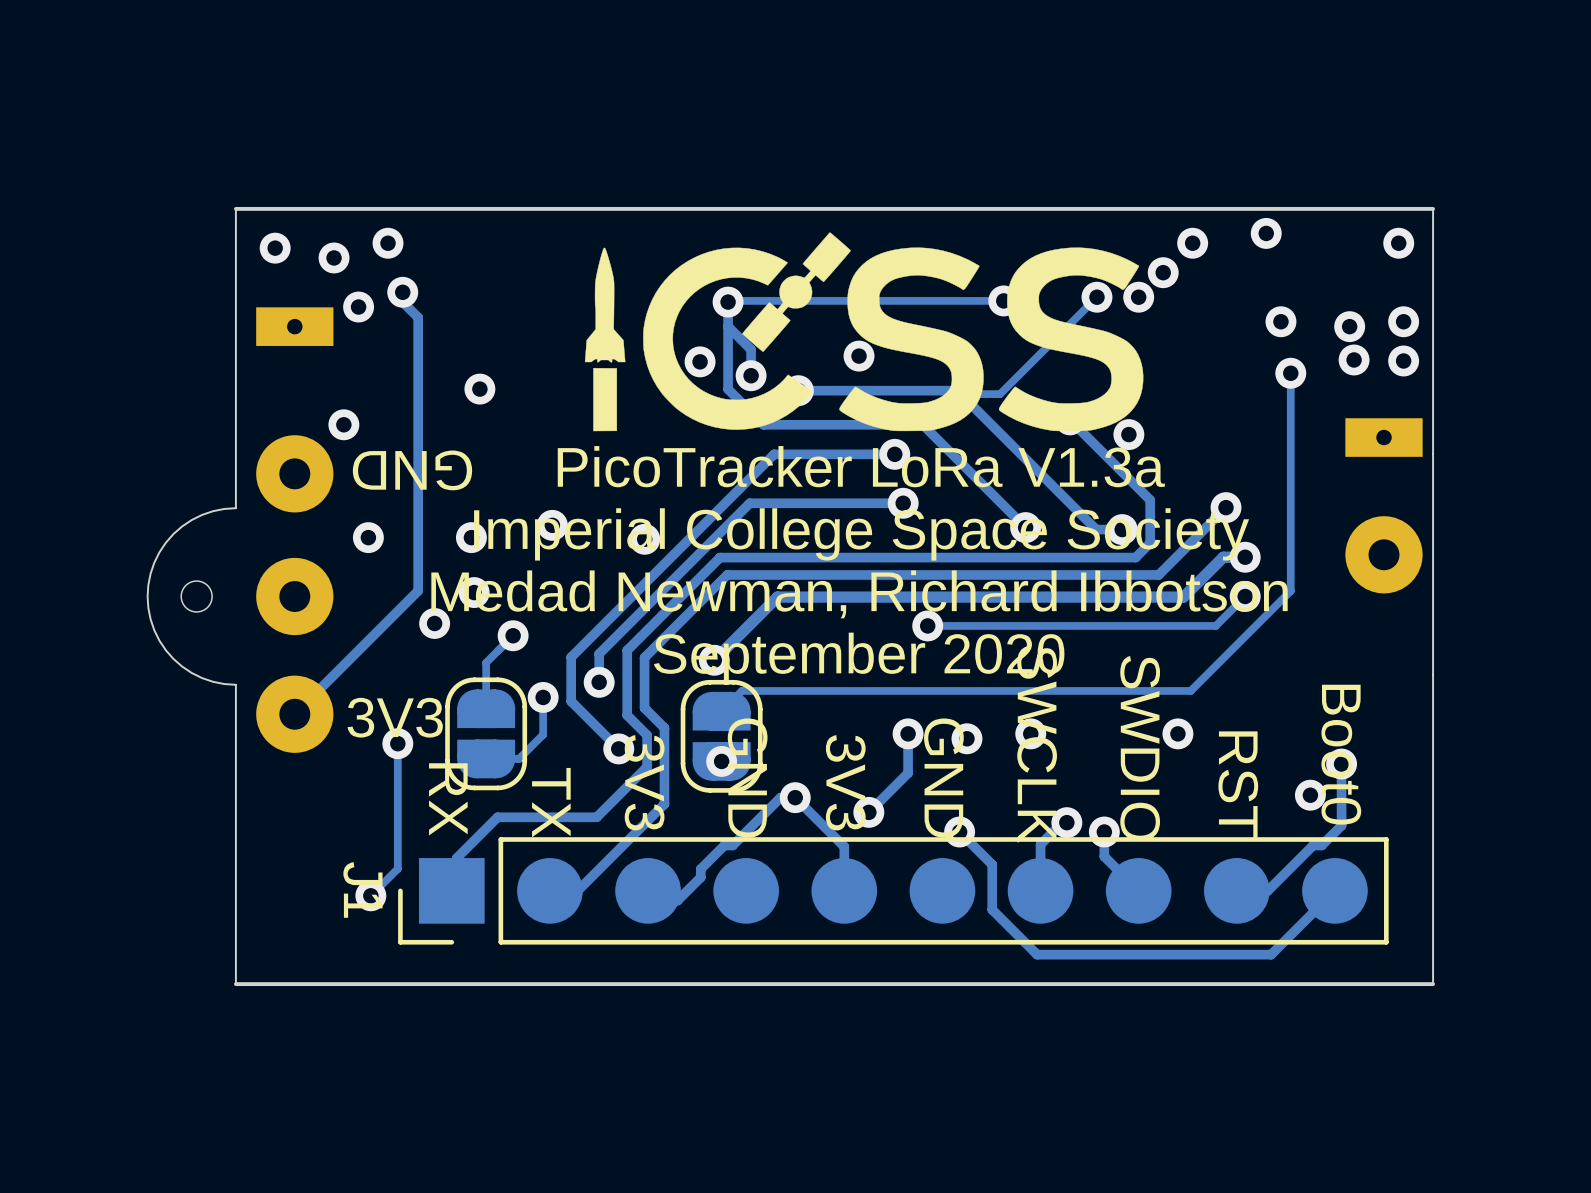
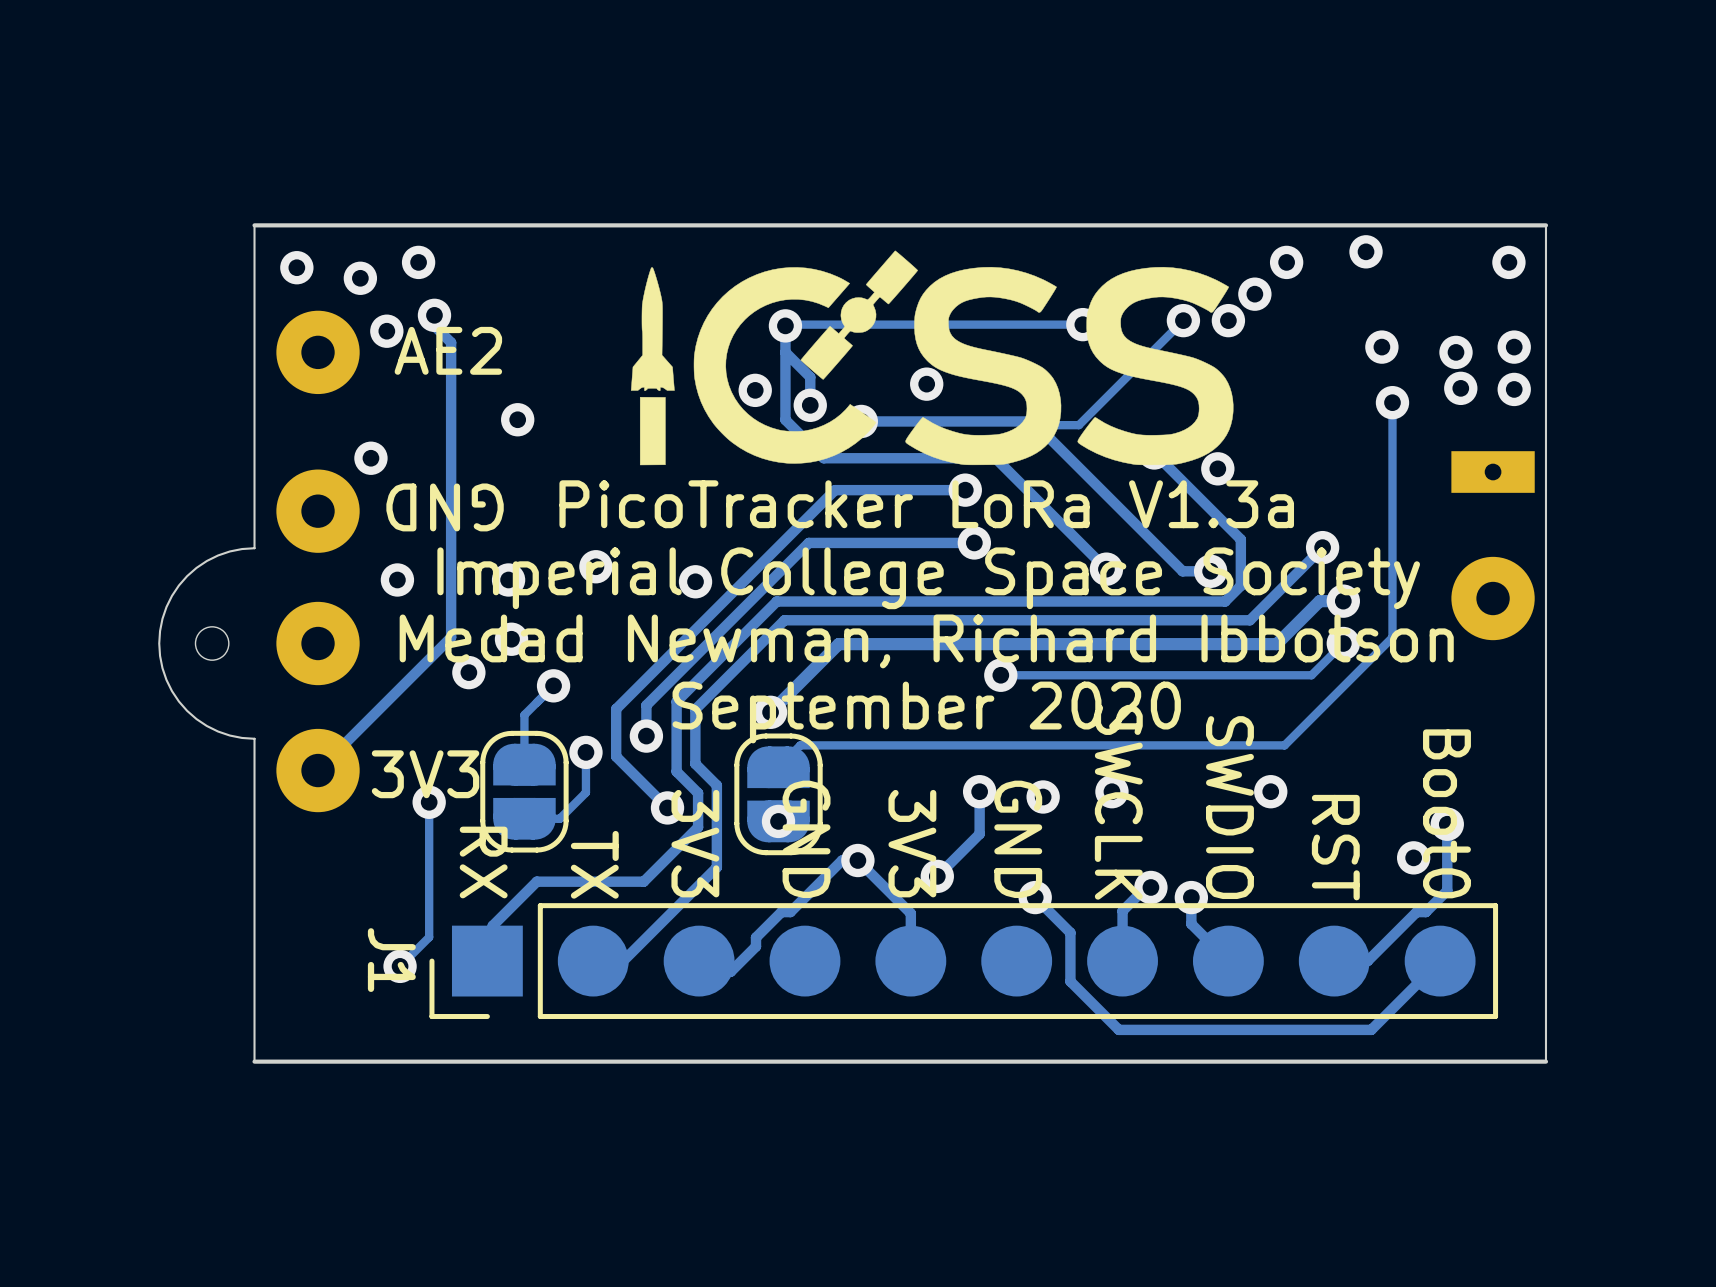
part: (294, 326) -> none
AE2: none -> (318, 352)

